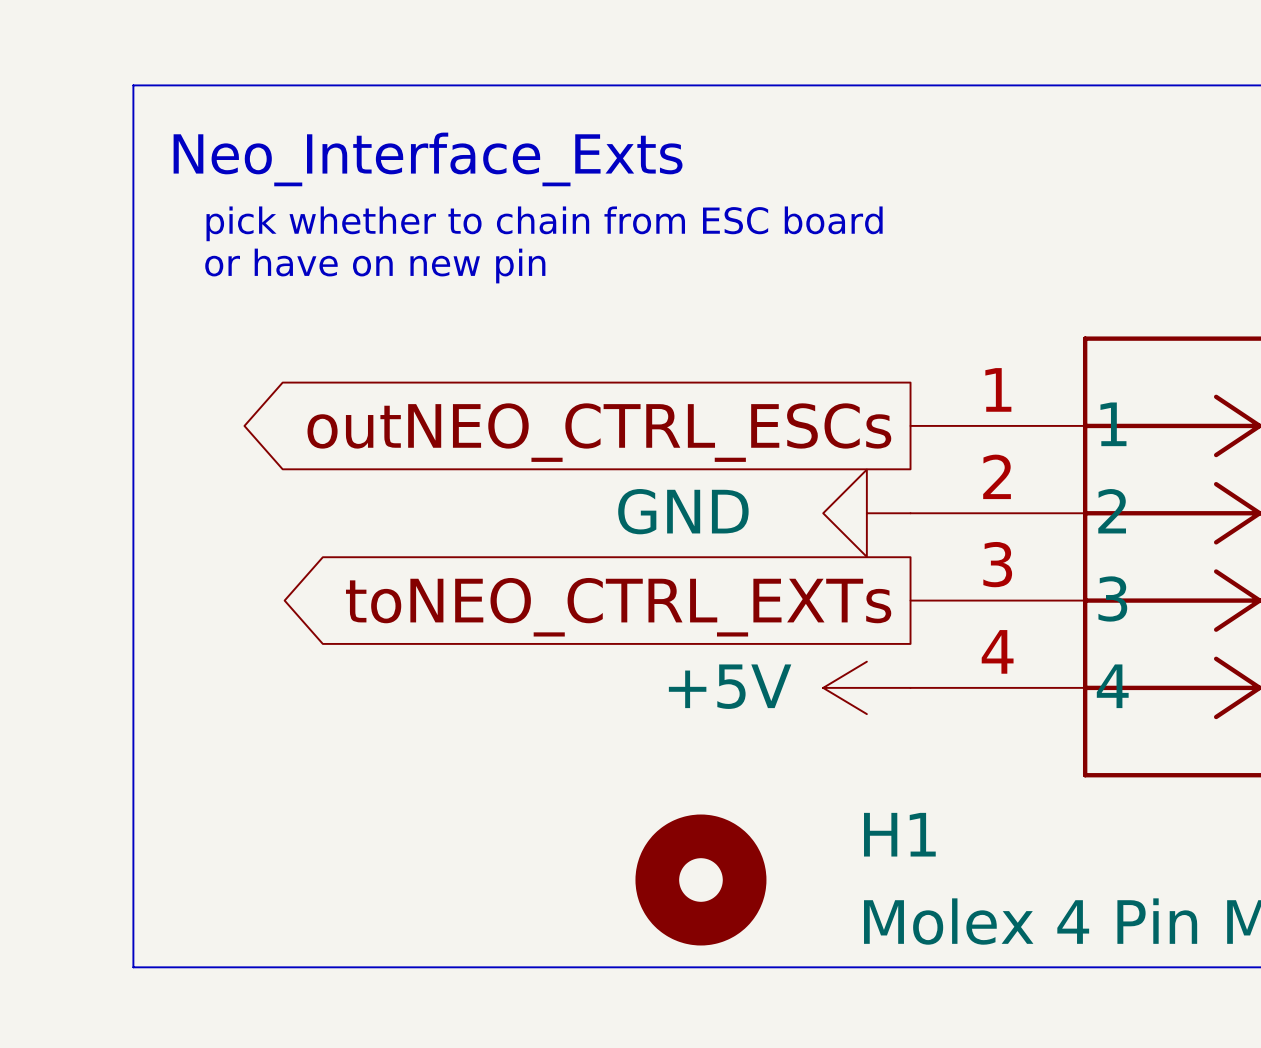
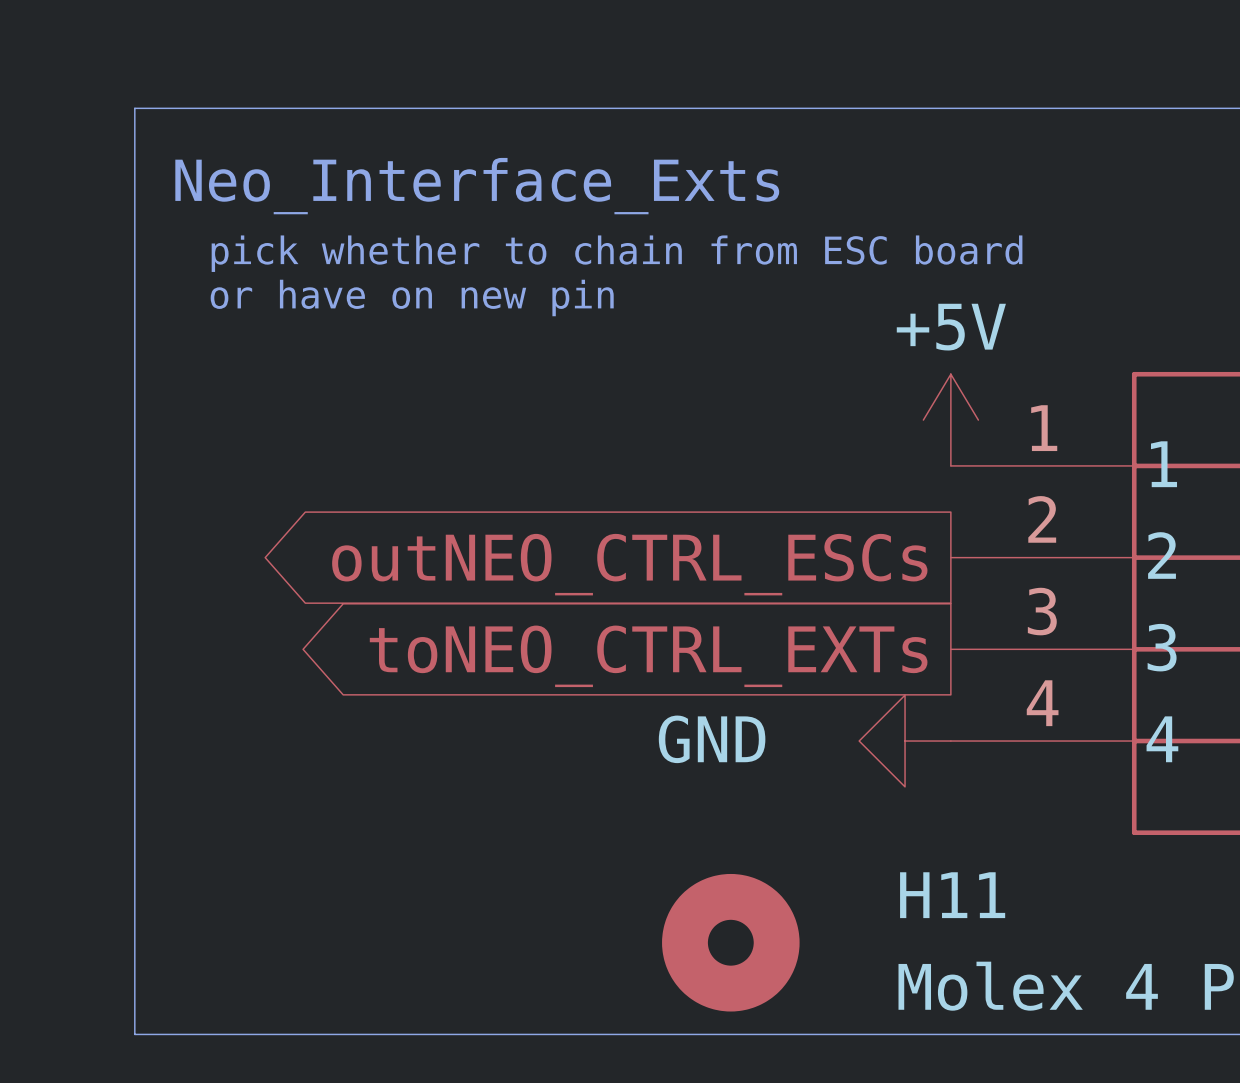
power symbol: none -> +5V (950, 420)
global label position: outNEO_CTRL_ESCs (599, 432) -> outNEO_CTRL_ESCs (629, 564)
power symbol: GND (866, 513) -> none
power symbol: +5V (866, 687) -> GND (905, 741)
H1 name: H1 (899, 834) -> H11 (952, 895)

